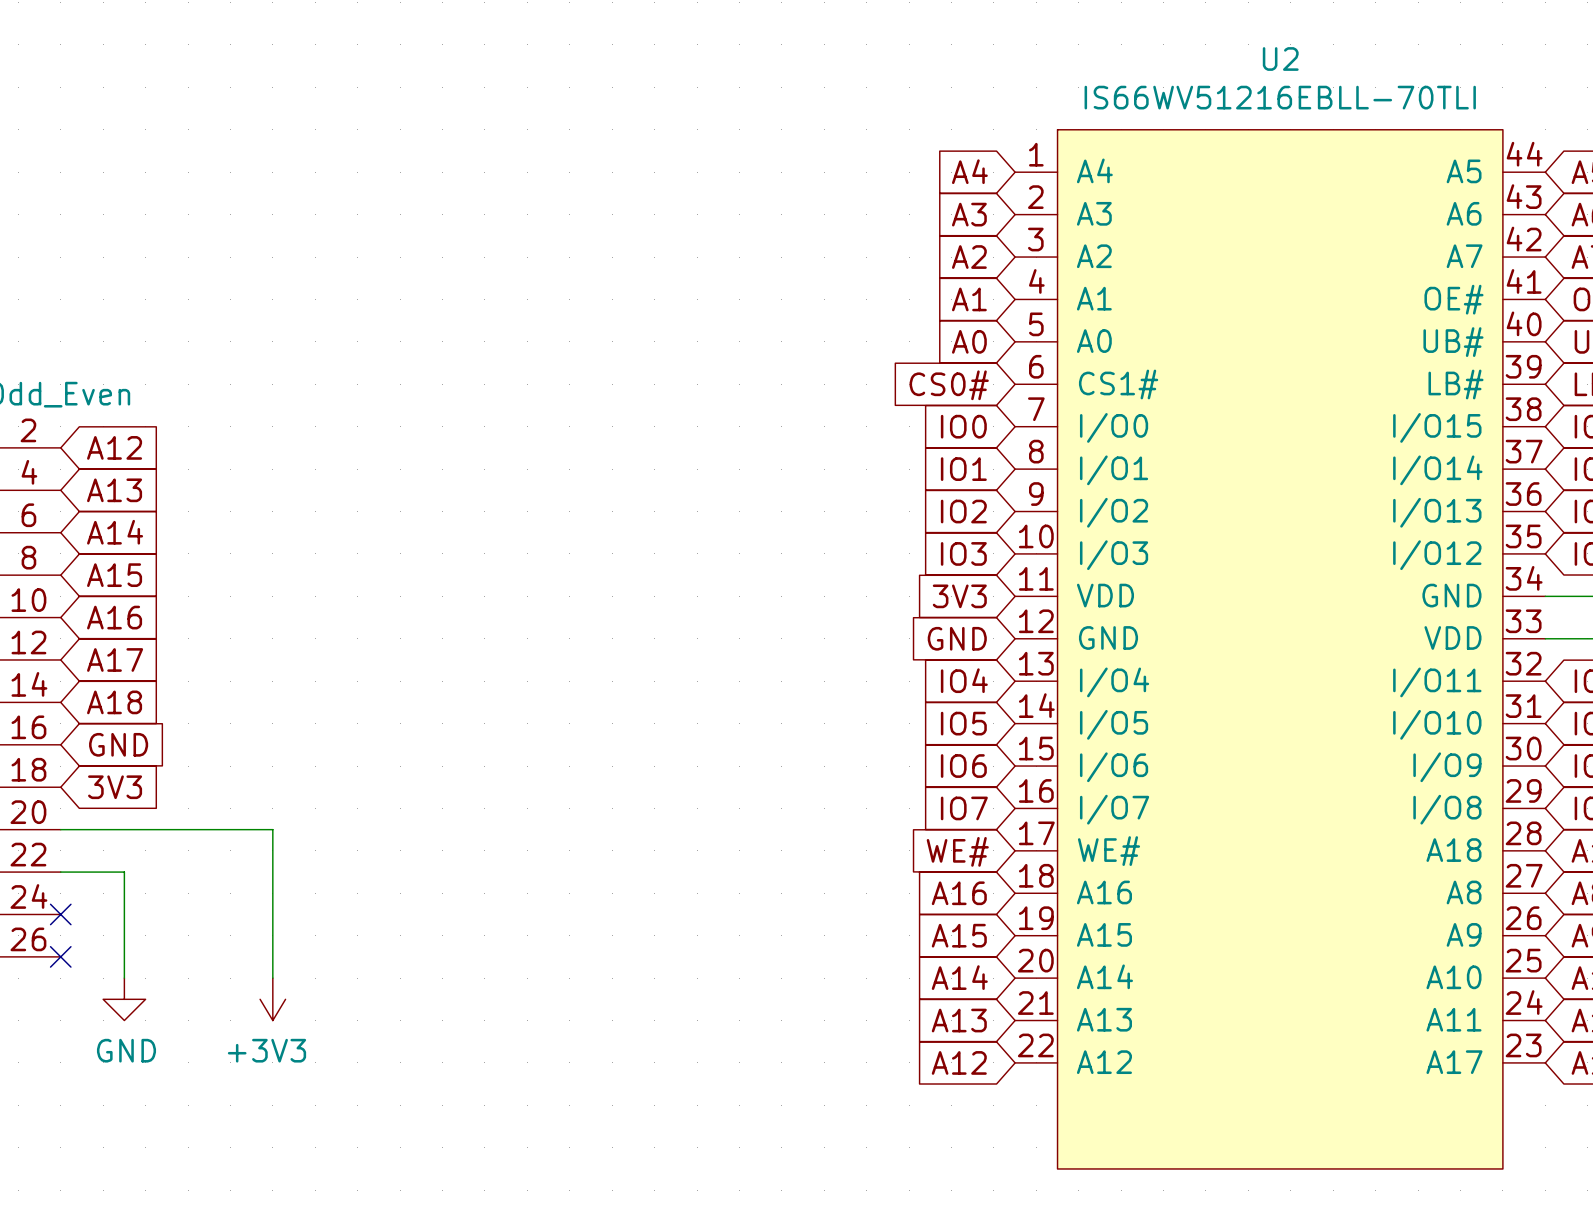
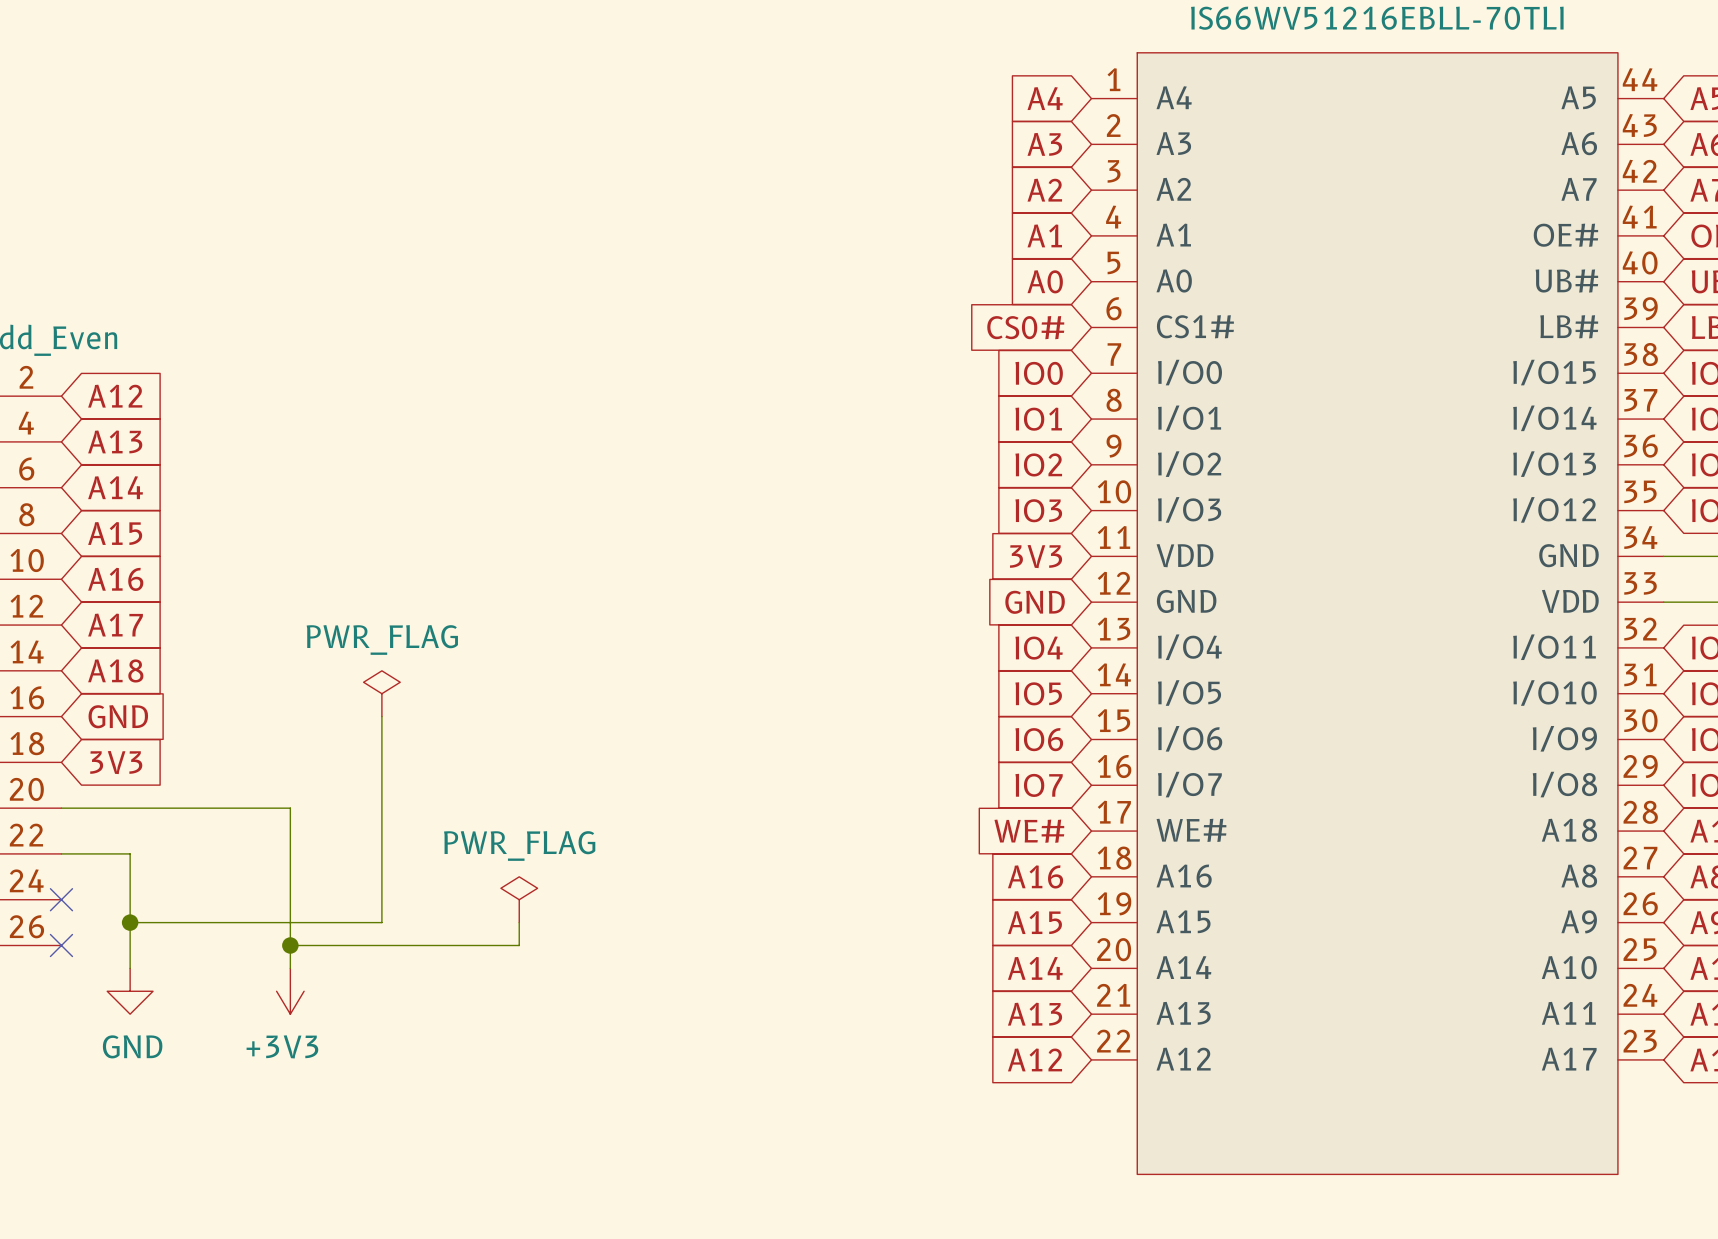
power symbol: none -> PWR_FLAG (381, 693)
wire: none -> (381, 716) (381, 922) (130, 922)
power symbol: none -> PWR_FLAG (519, 899)
junction: none -> (130, 922)
wire: none -> (519, 922) (519, 945) (290, 945)
junction: none -> (290, 945)

